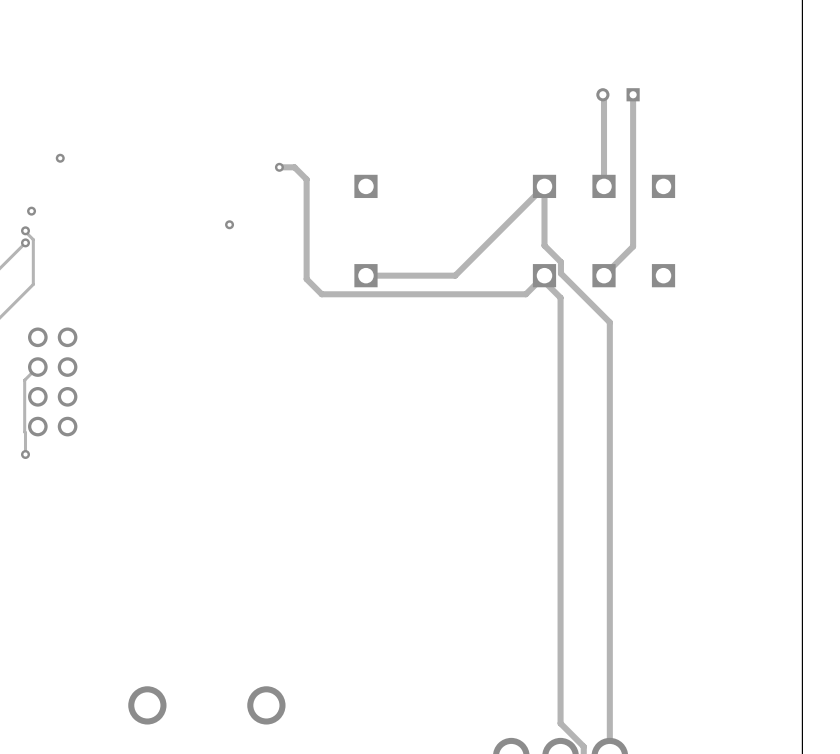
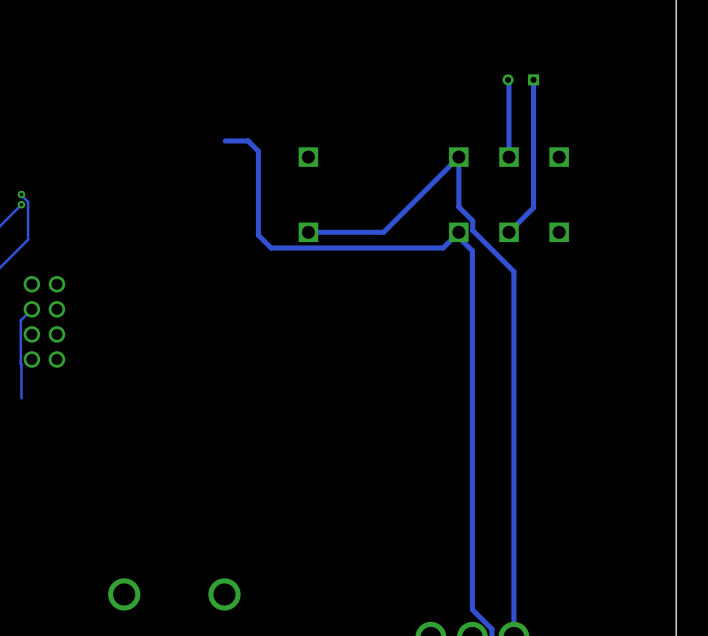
via: (60, 158) -> none
track: none -> (235, 141) (225, 141)
via: (279, 167) -> none
via: (31, 211) -> none
via: (229, 224) -> none
track: none -> (21, 383) (21, 398)
via: (25, 454) -> none

